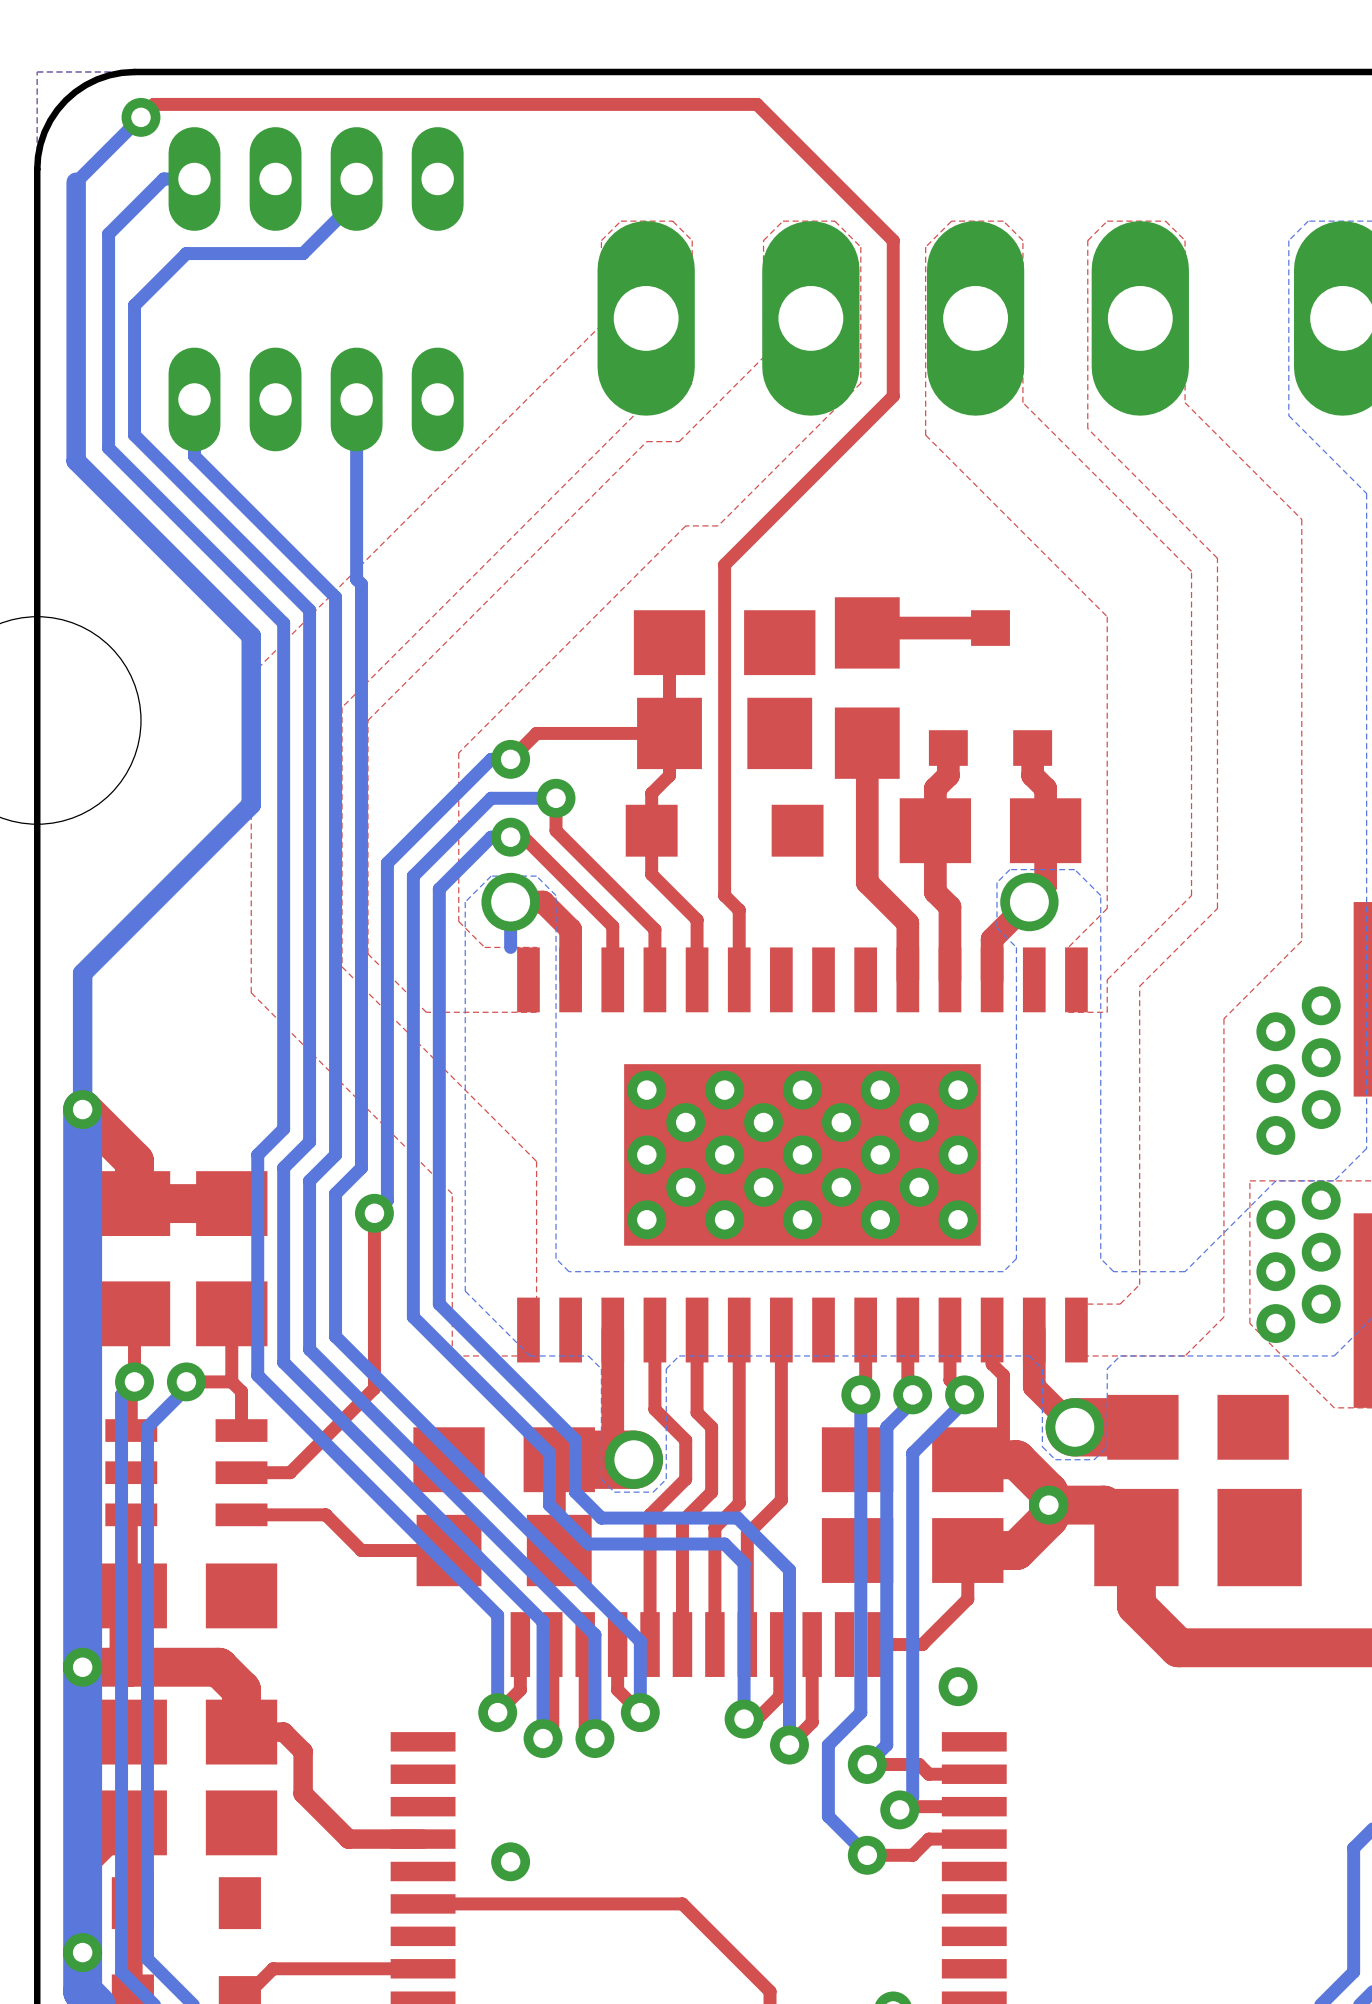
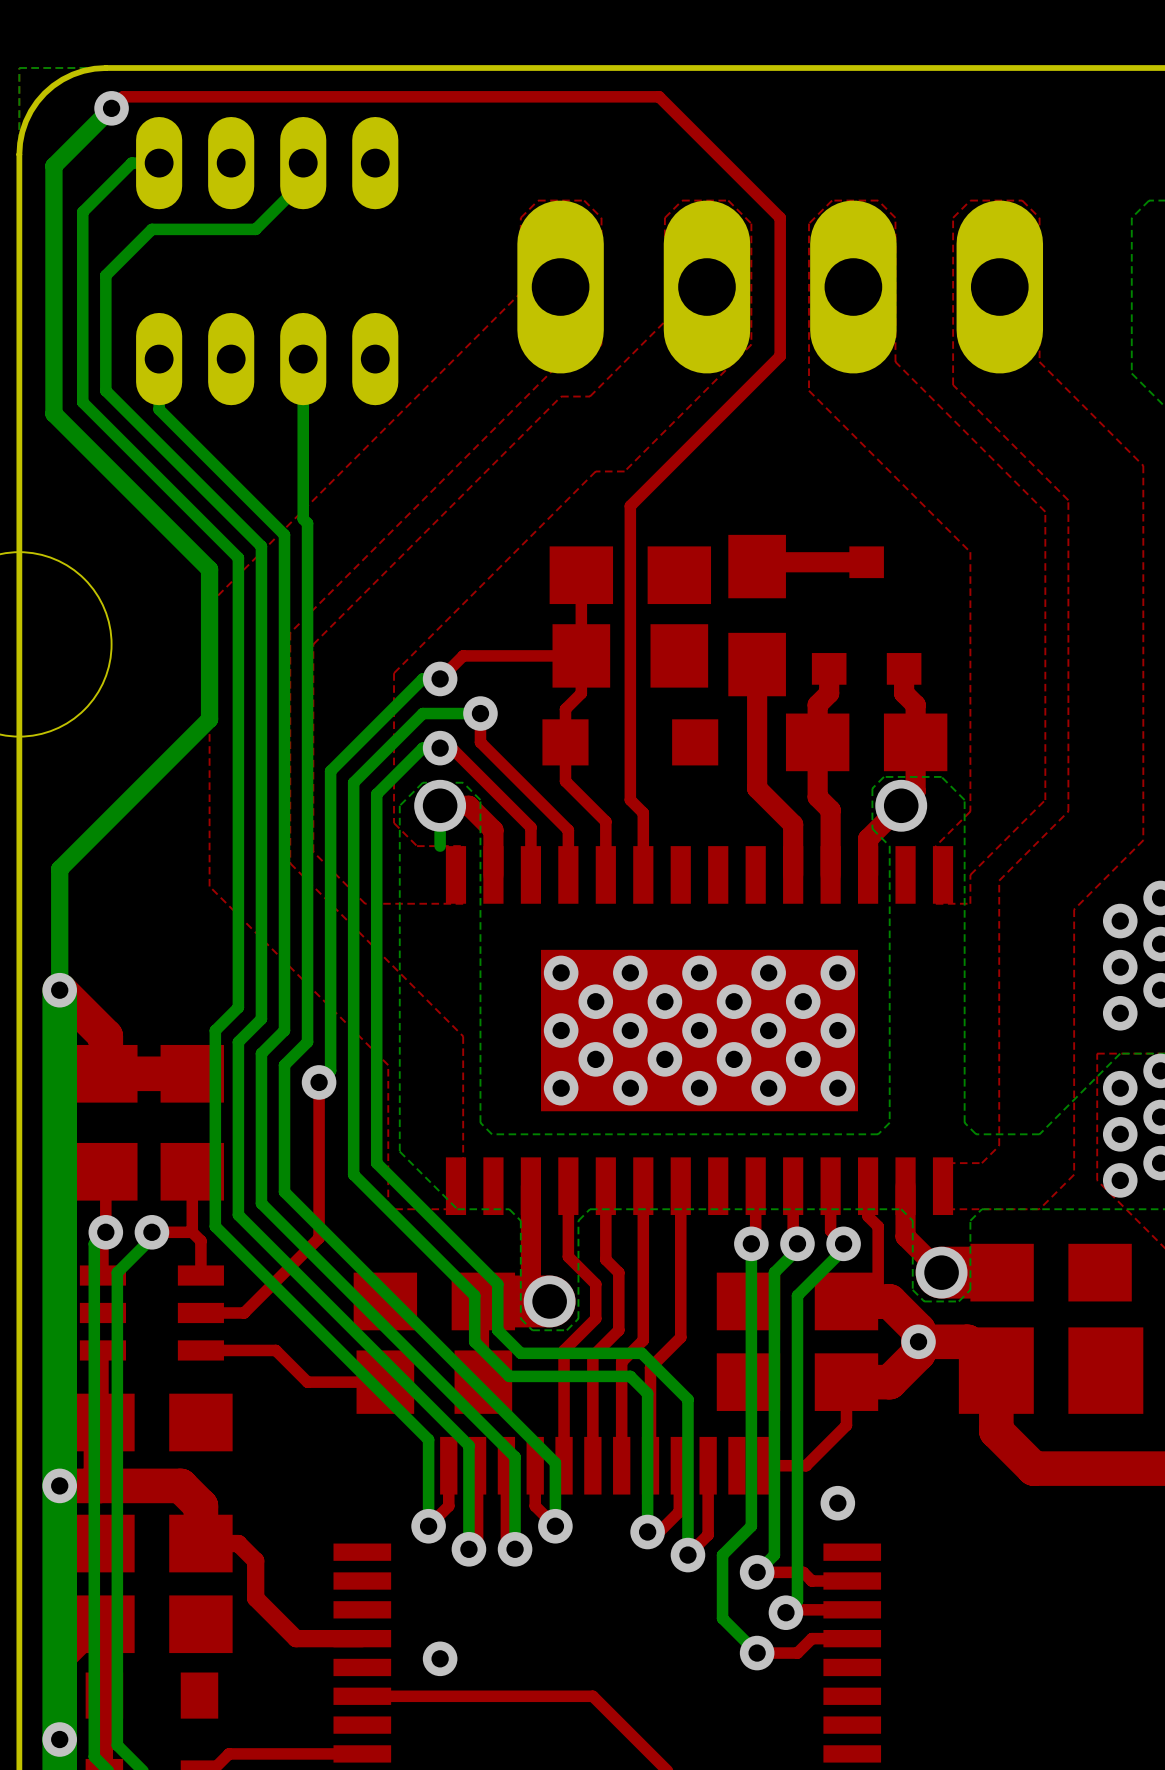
bottom track width: thin (141, 117) (76, 182) -> thick (111, 108) (53, 165)

